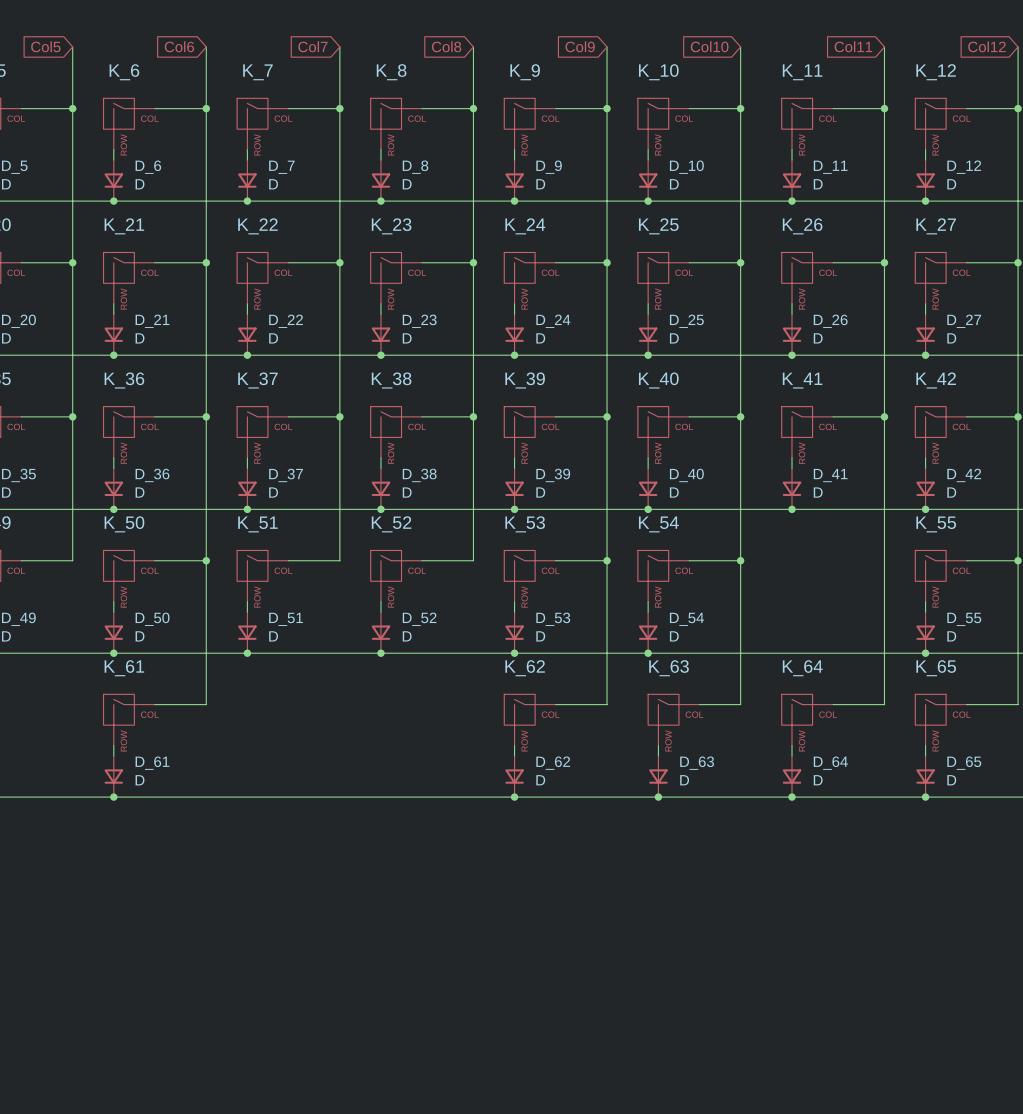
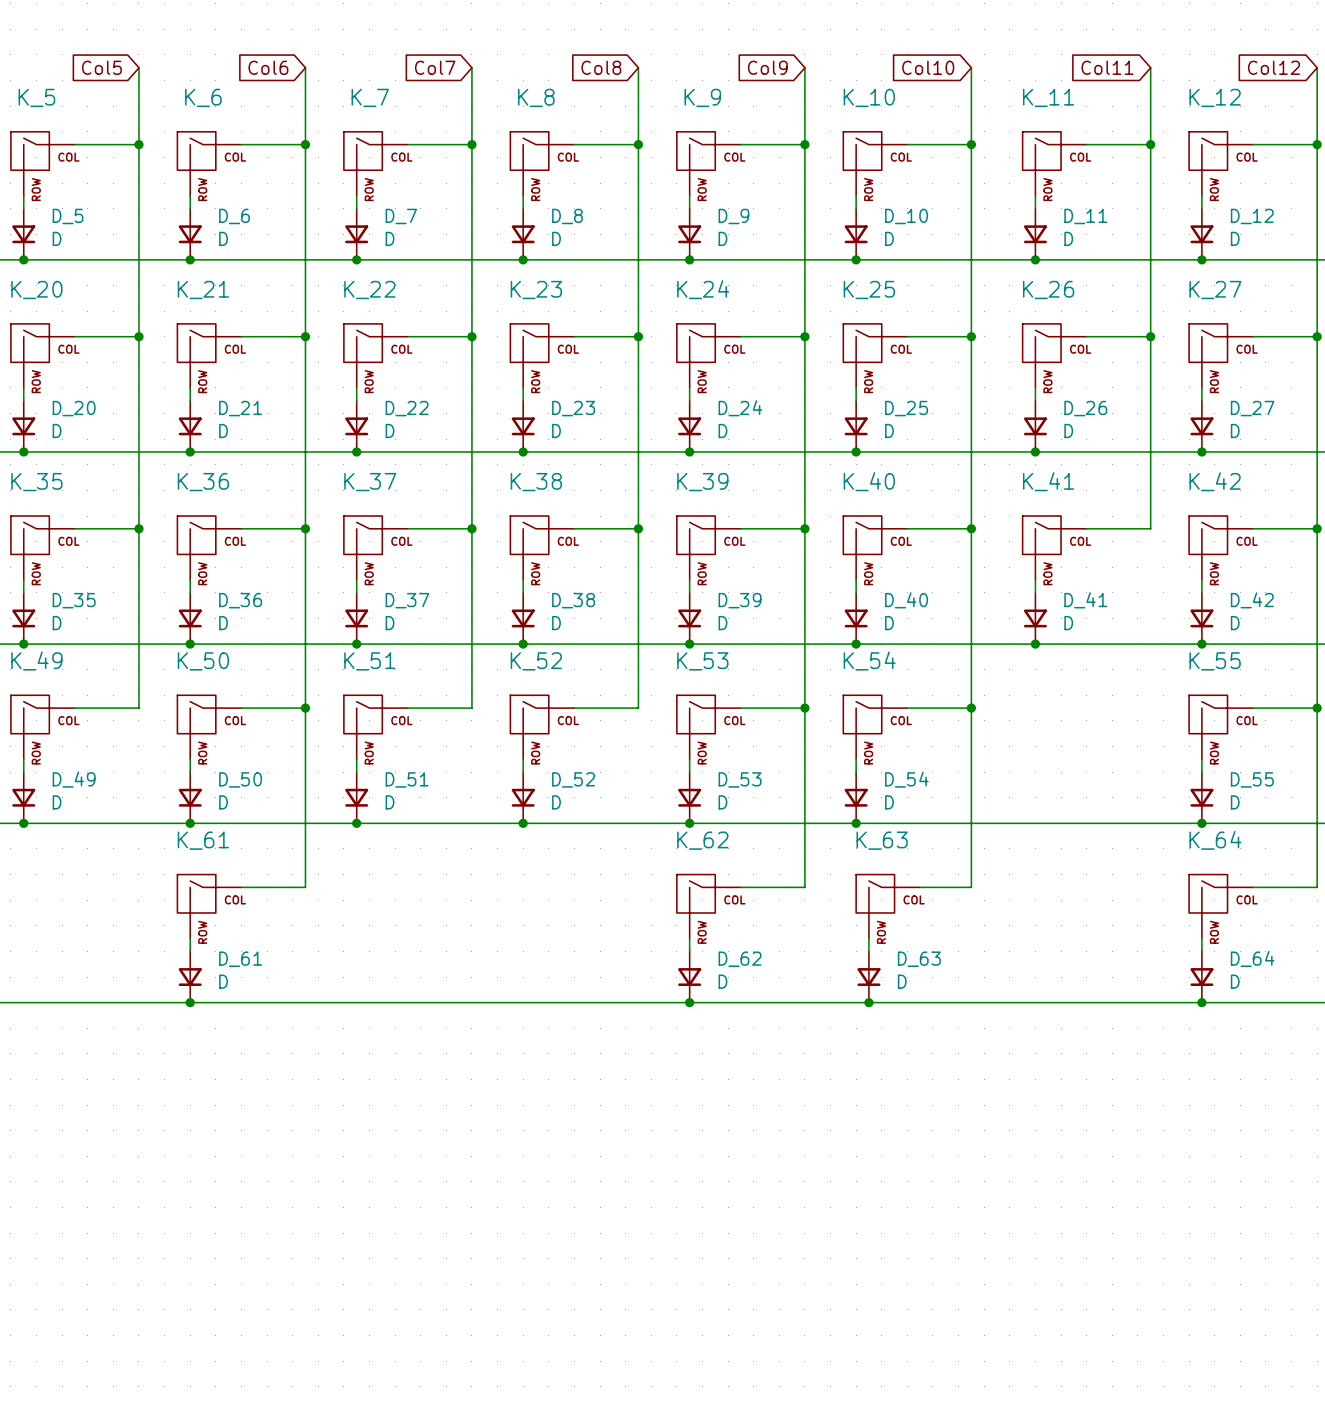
wire: (884, 416) (884, 704) (833, 704) -> none
junction: (884, 416) -> none
K_65 name: K_65 (936, 668) -> K_64 (1215, 840)
K_64: (807, 720) -> none
wire: (792, 745) (792, 755) -> none
D_65 name: D_65 (964, 763) -> D_64 (1252, 958)
D_64: D (792, 776) -> none
junction: (792, 797) -> none

